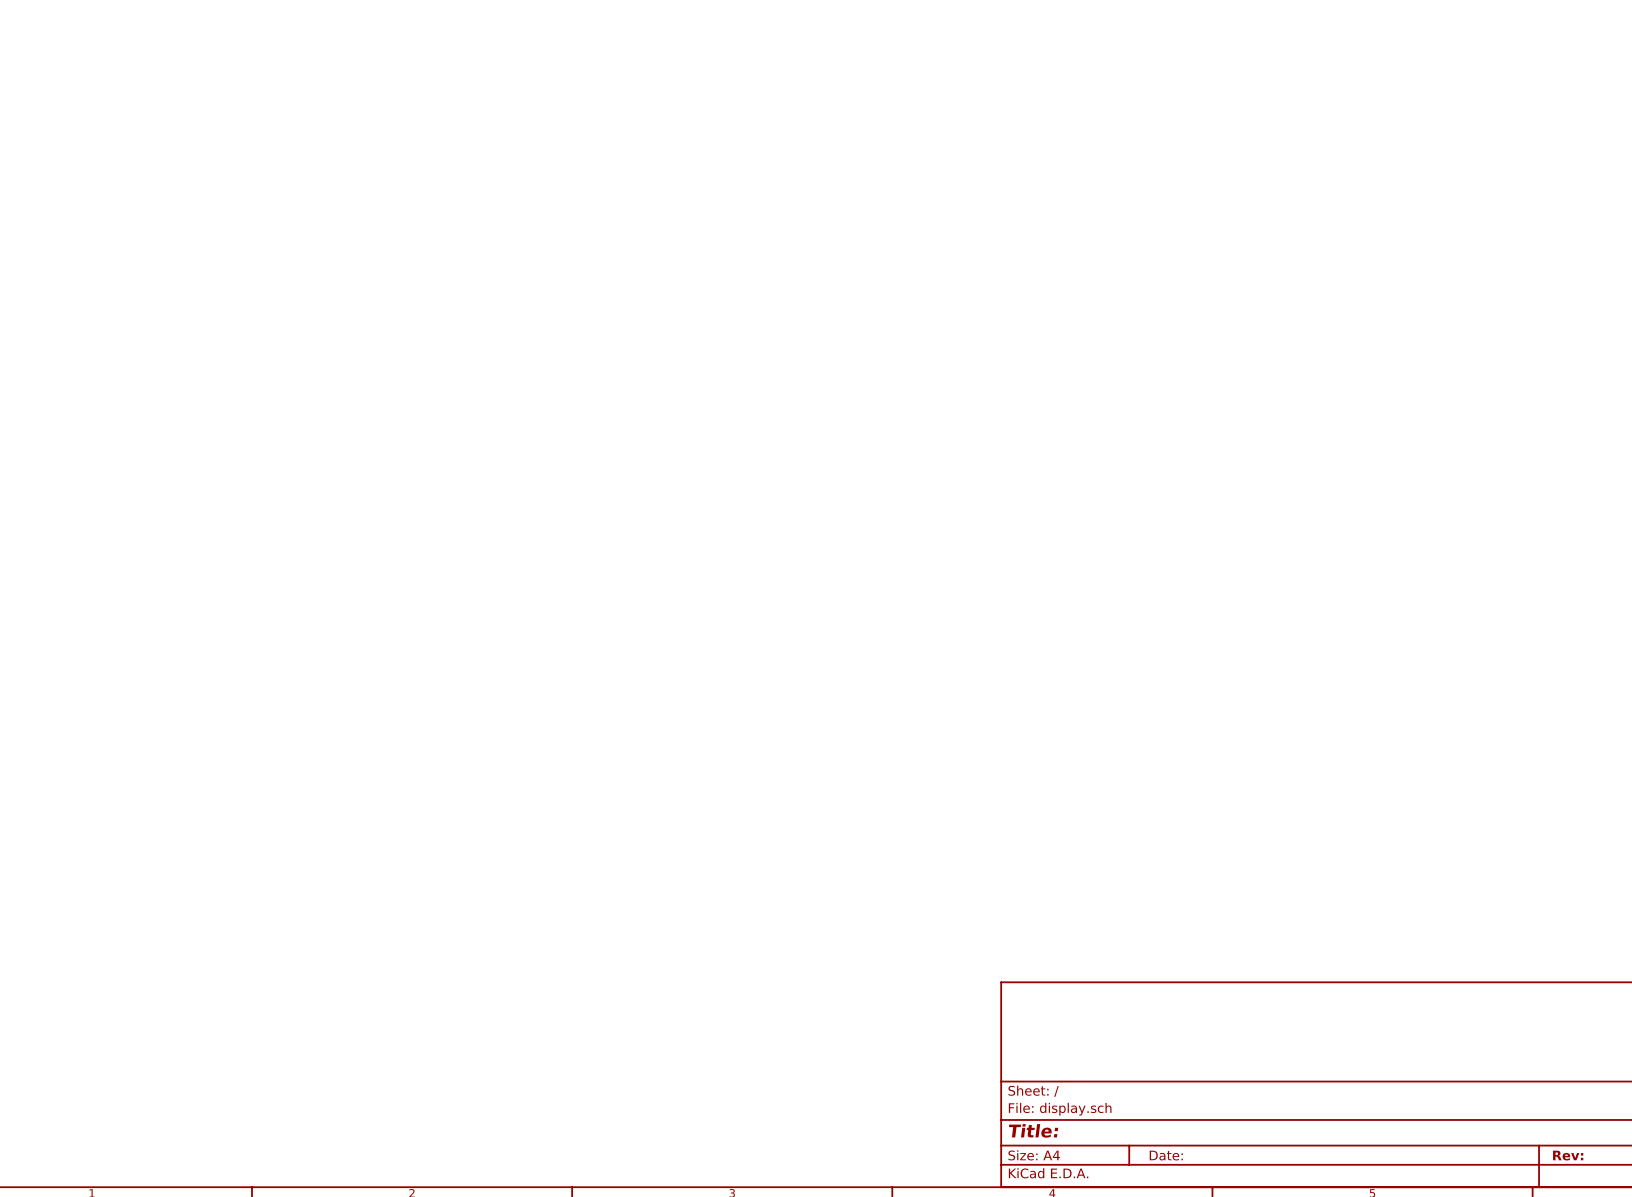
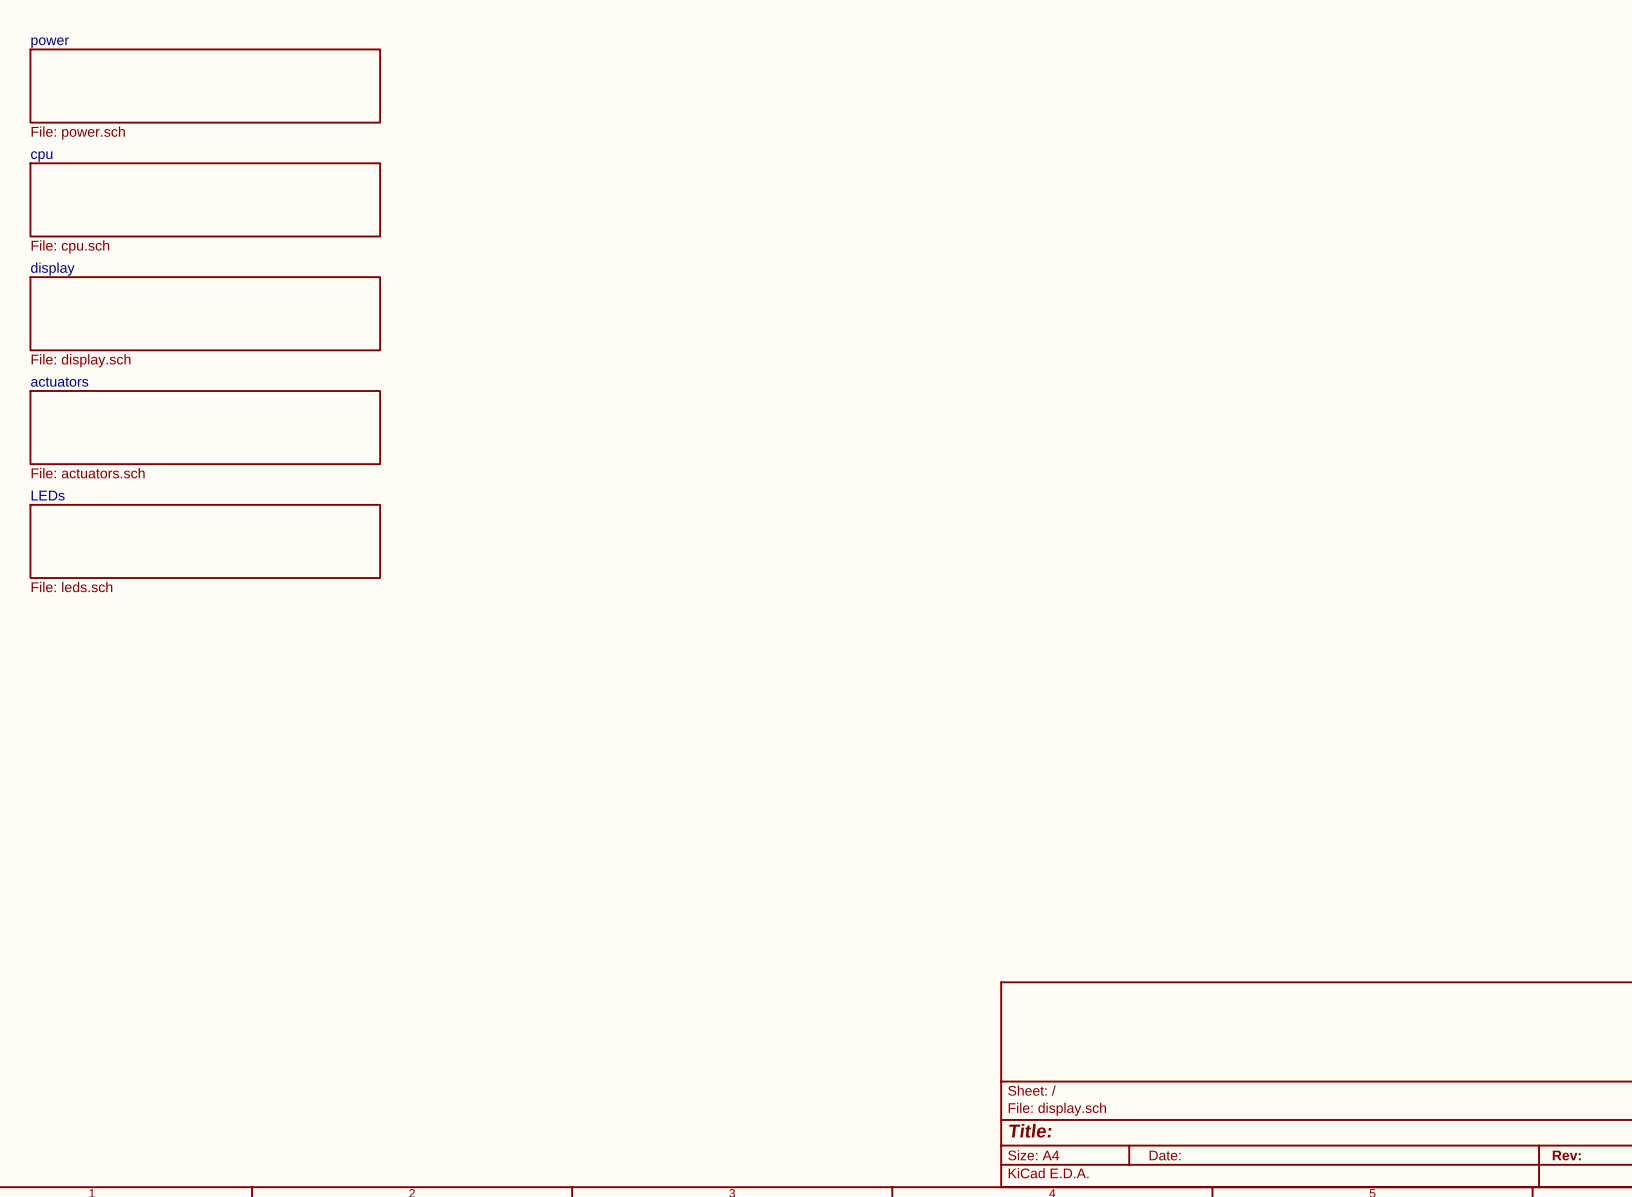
sheet power: none -> File: power.sch (205, 86)
sheet cpu: none -> File: cpu.sch (205, 199)
sheet display: none -> File: display.sch (205, 313)
sheet actuators: none -> File: actuators.sch (205, 427)
sheet LEDs: none -> File: leds.sch (205, 541)

